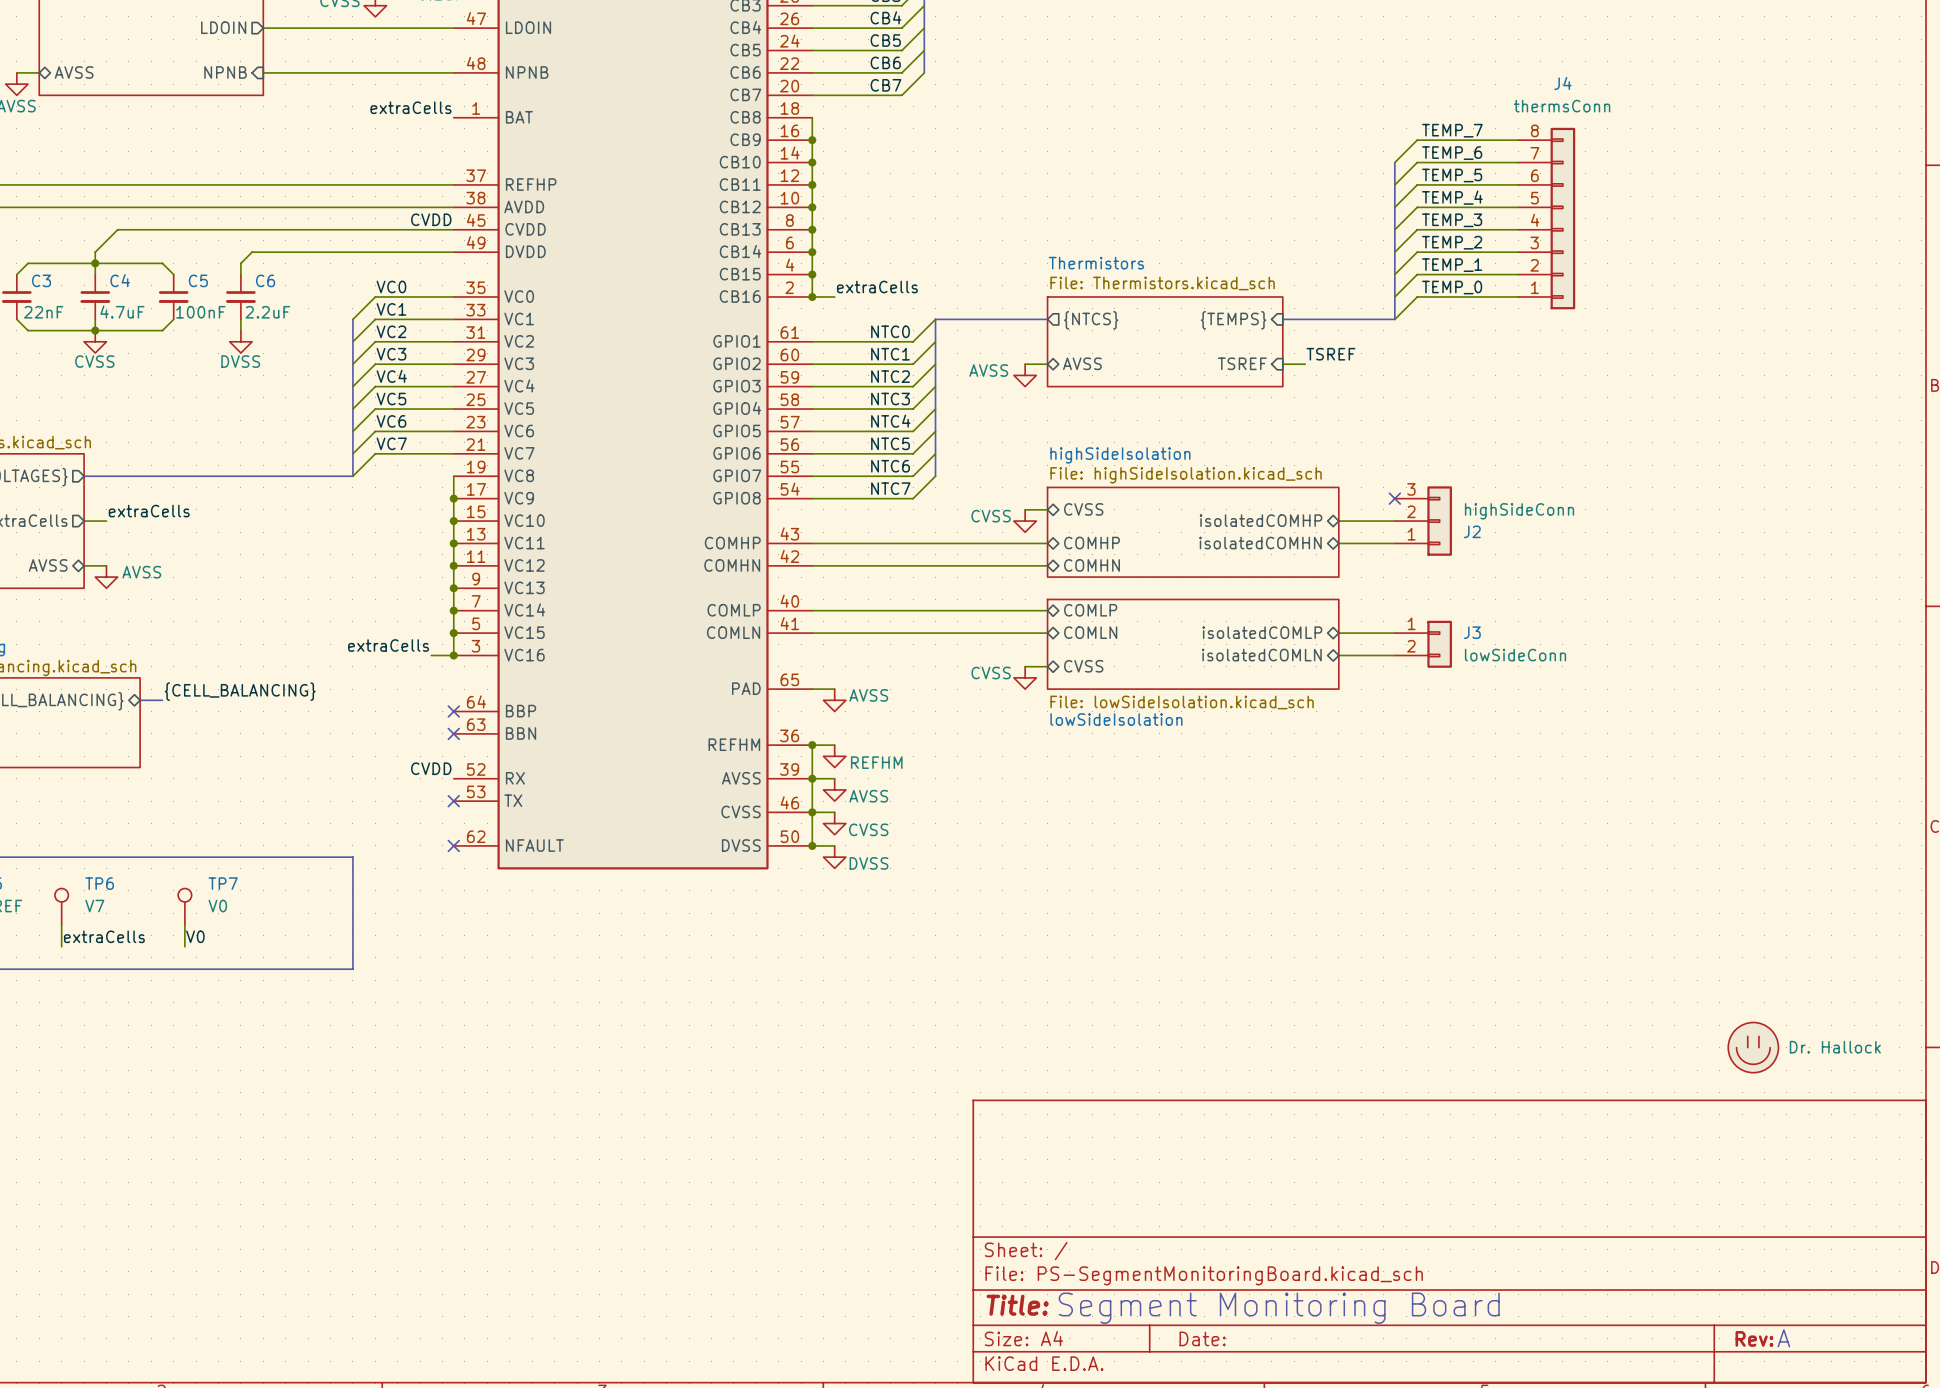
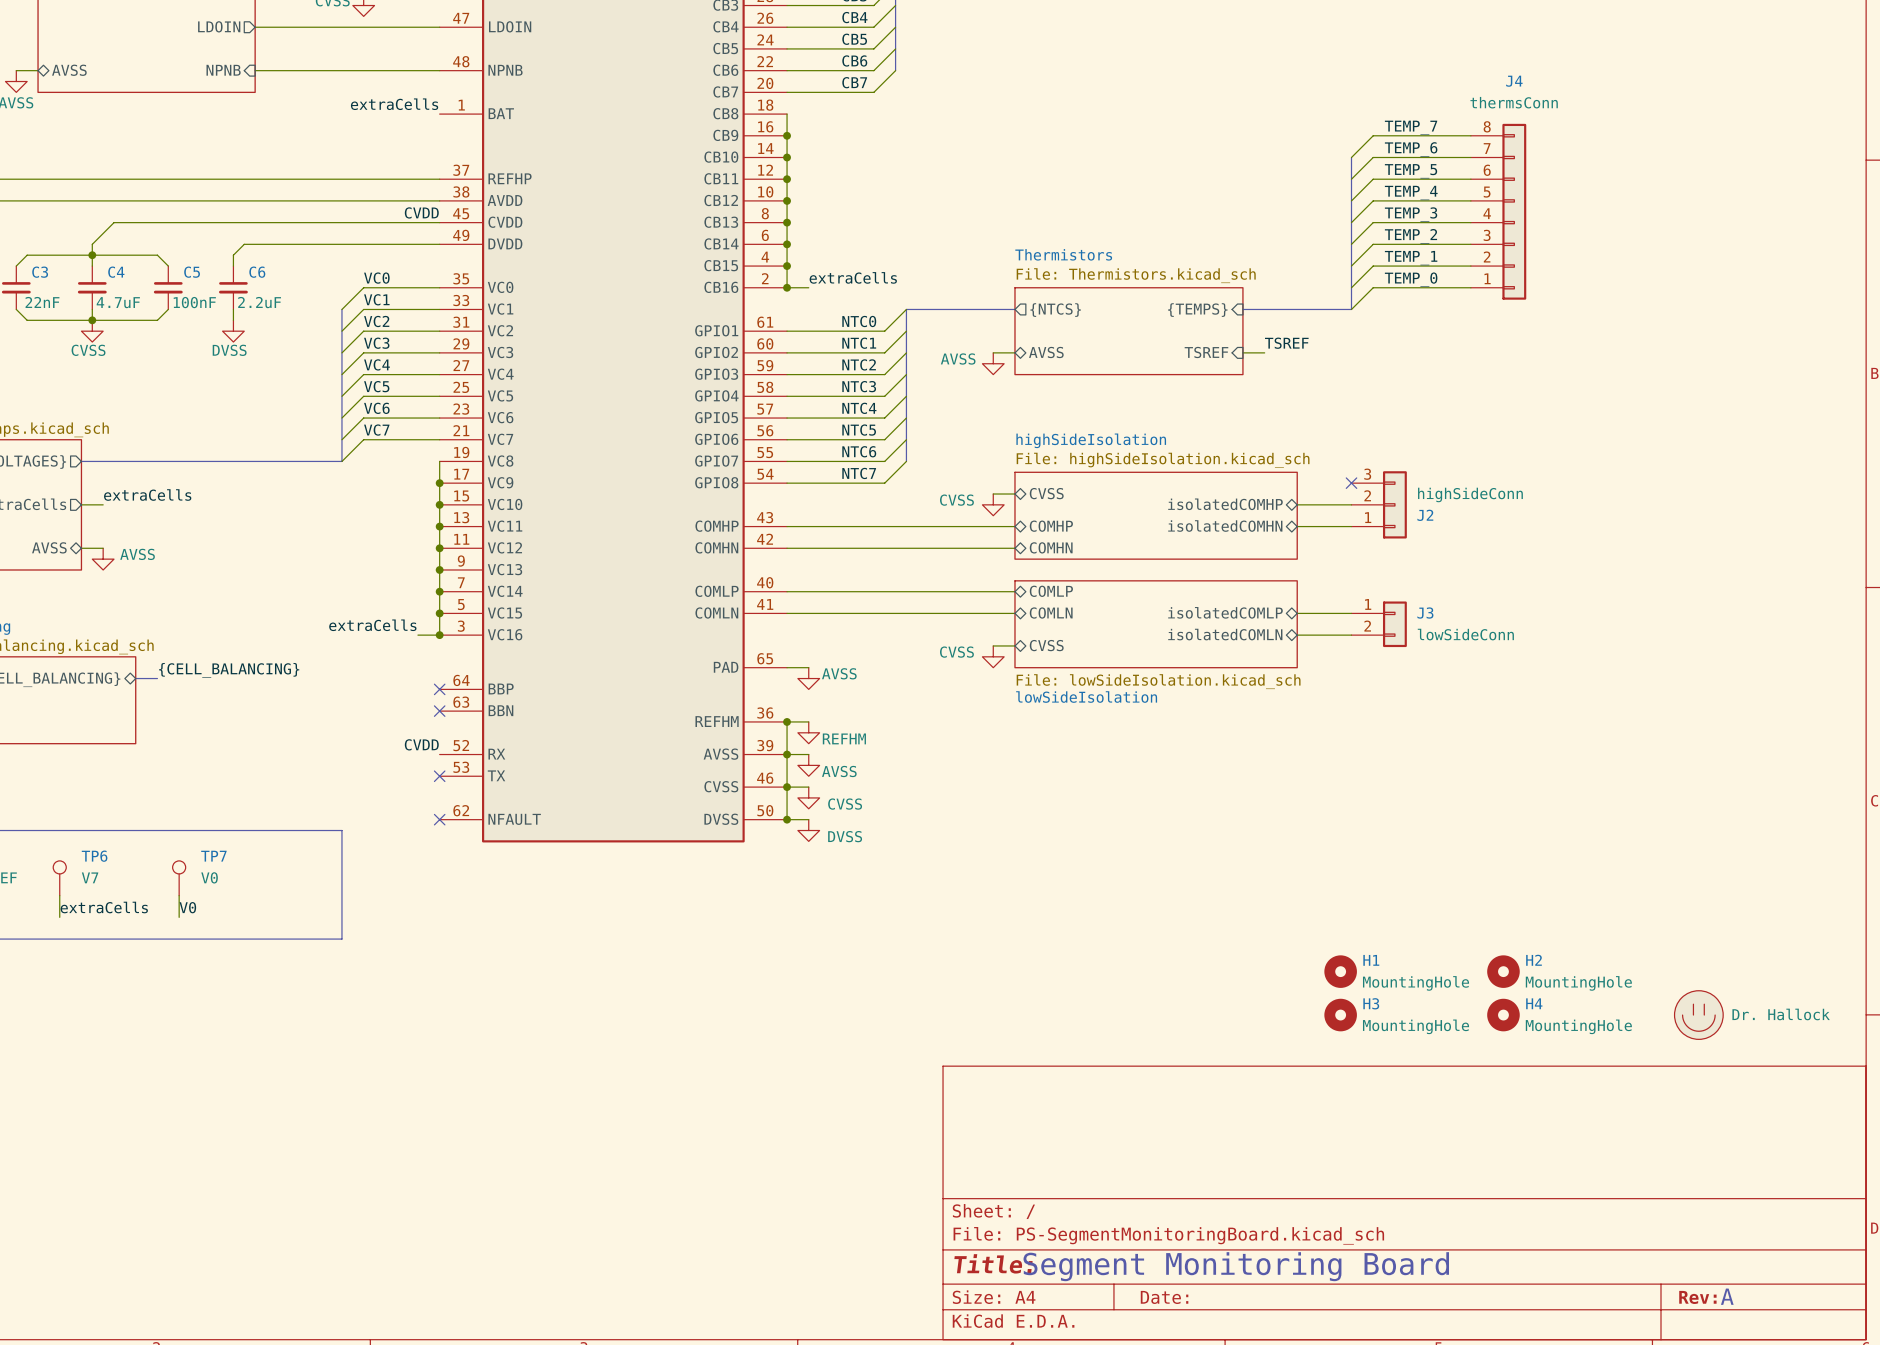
H1: none -> MountingHole (1340, 971)
H2: none -> MountingHole (1503, 971)
H3: none -> MountingHole (1340, 1015)
H4: none -> MountingHole (1503, 1015)

